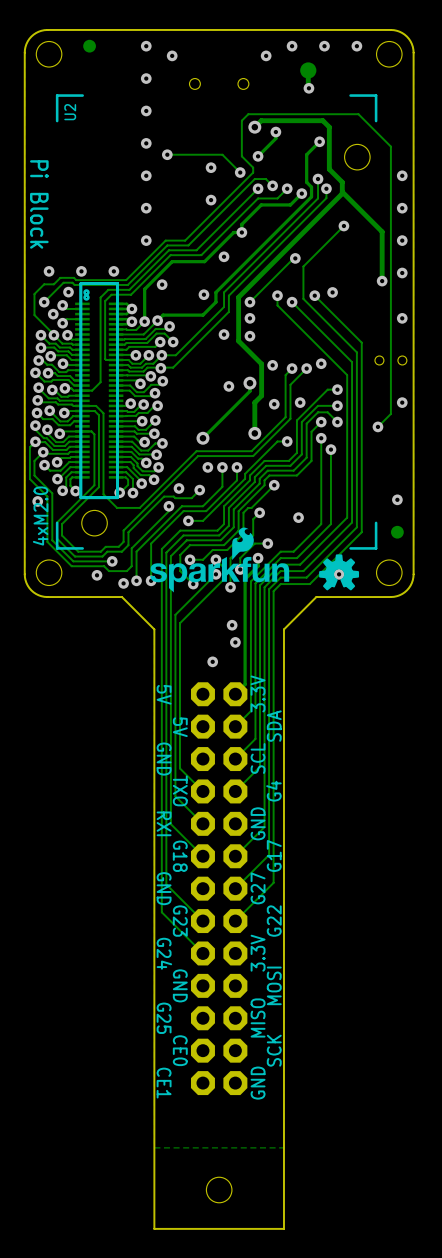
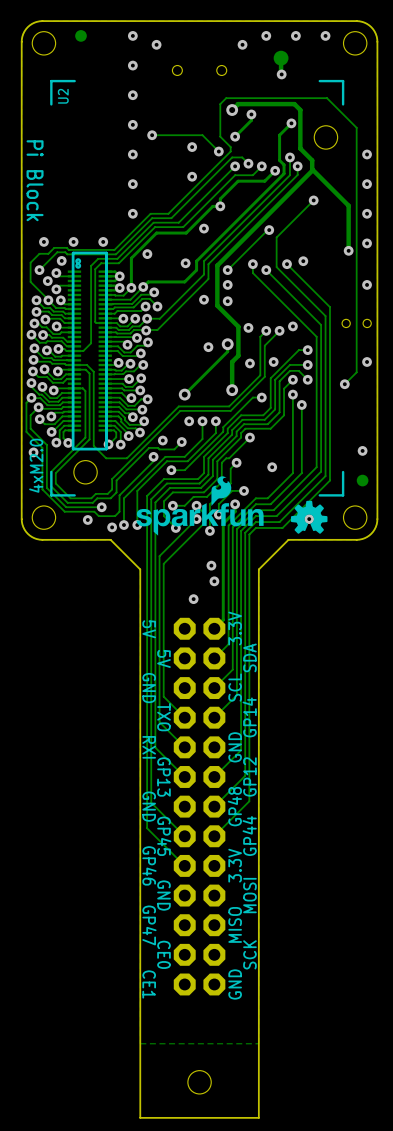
text: G4 (273, 791) -> GP14 (249, 717)
text: G17 (274, 855) -> GP12 (249, 776)
text: G18 (180, 856) -> GP13 (163, 776)
text: G27 (258, 888) -> GP48 (234, 806)
text: G23 (180, 921) -> GP45 (164, 836)
text: G22 (274, 921) -> GP44 (249, 836)
text: G24 (164, 953) -> GP46 (149, 865)
text: G25 (164, 1018) -> GP47 (149, 925)

